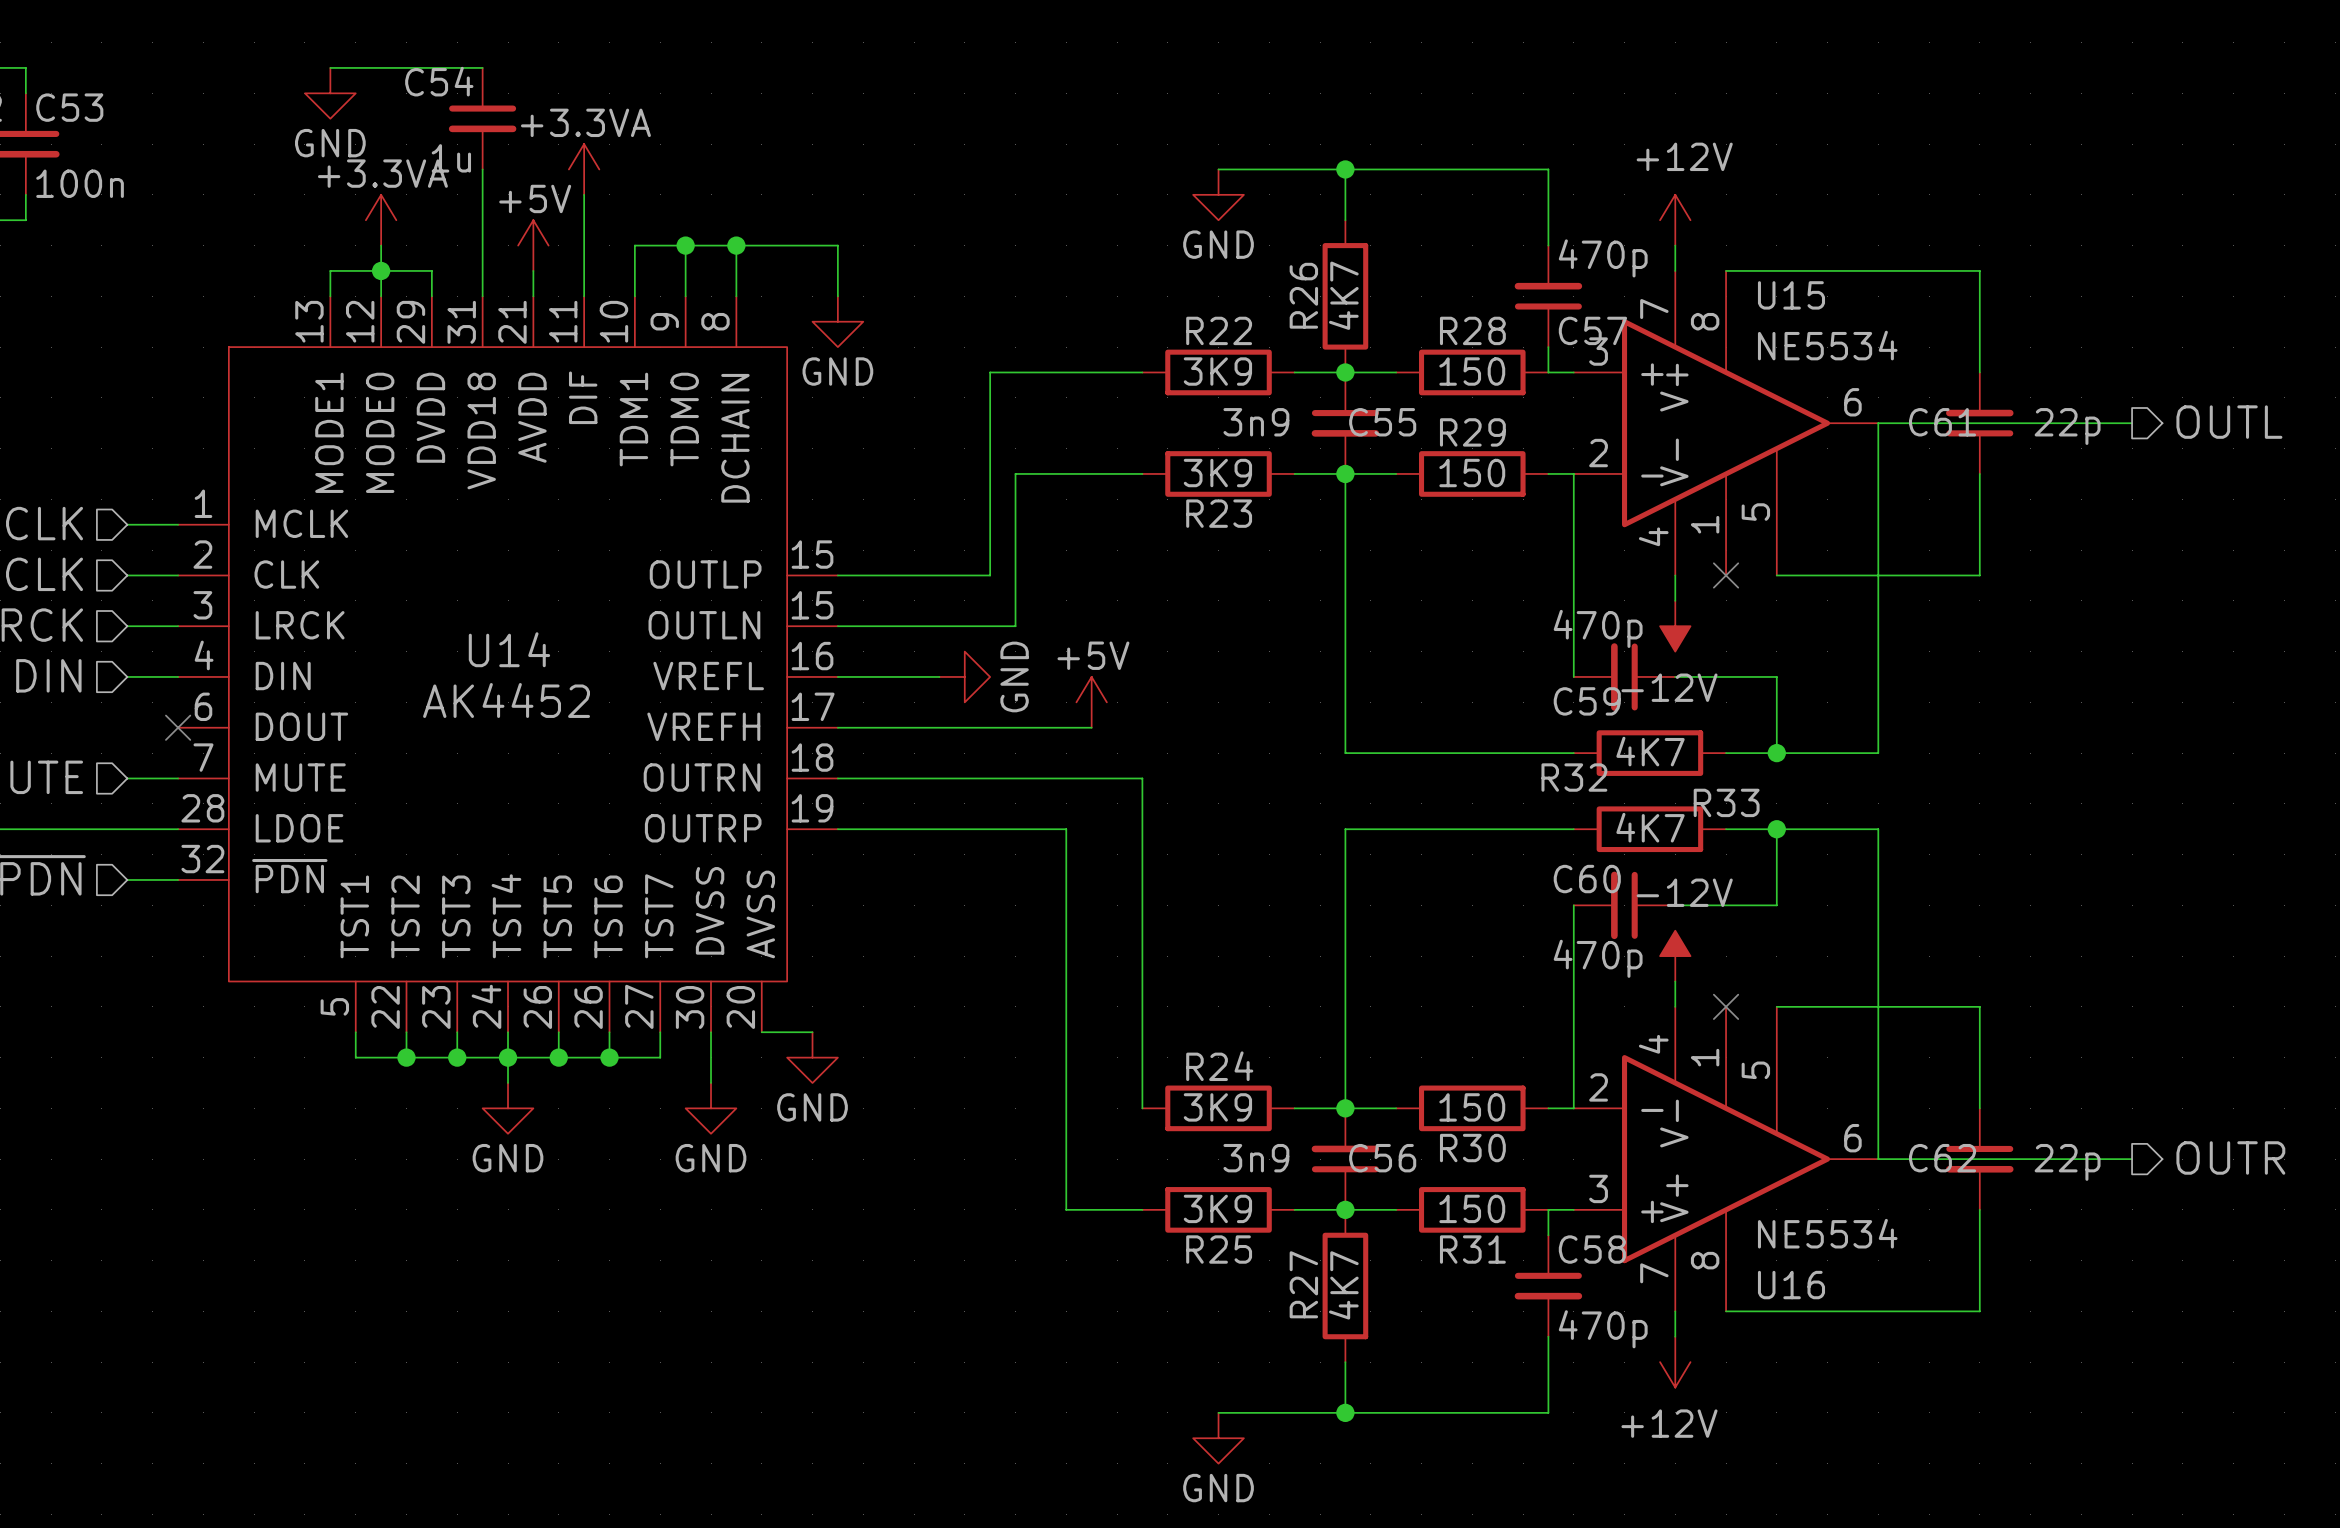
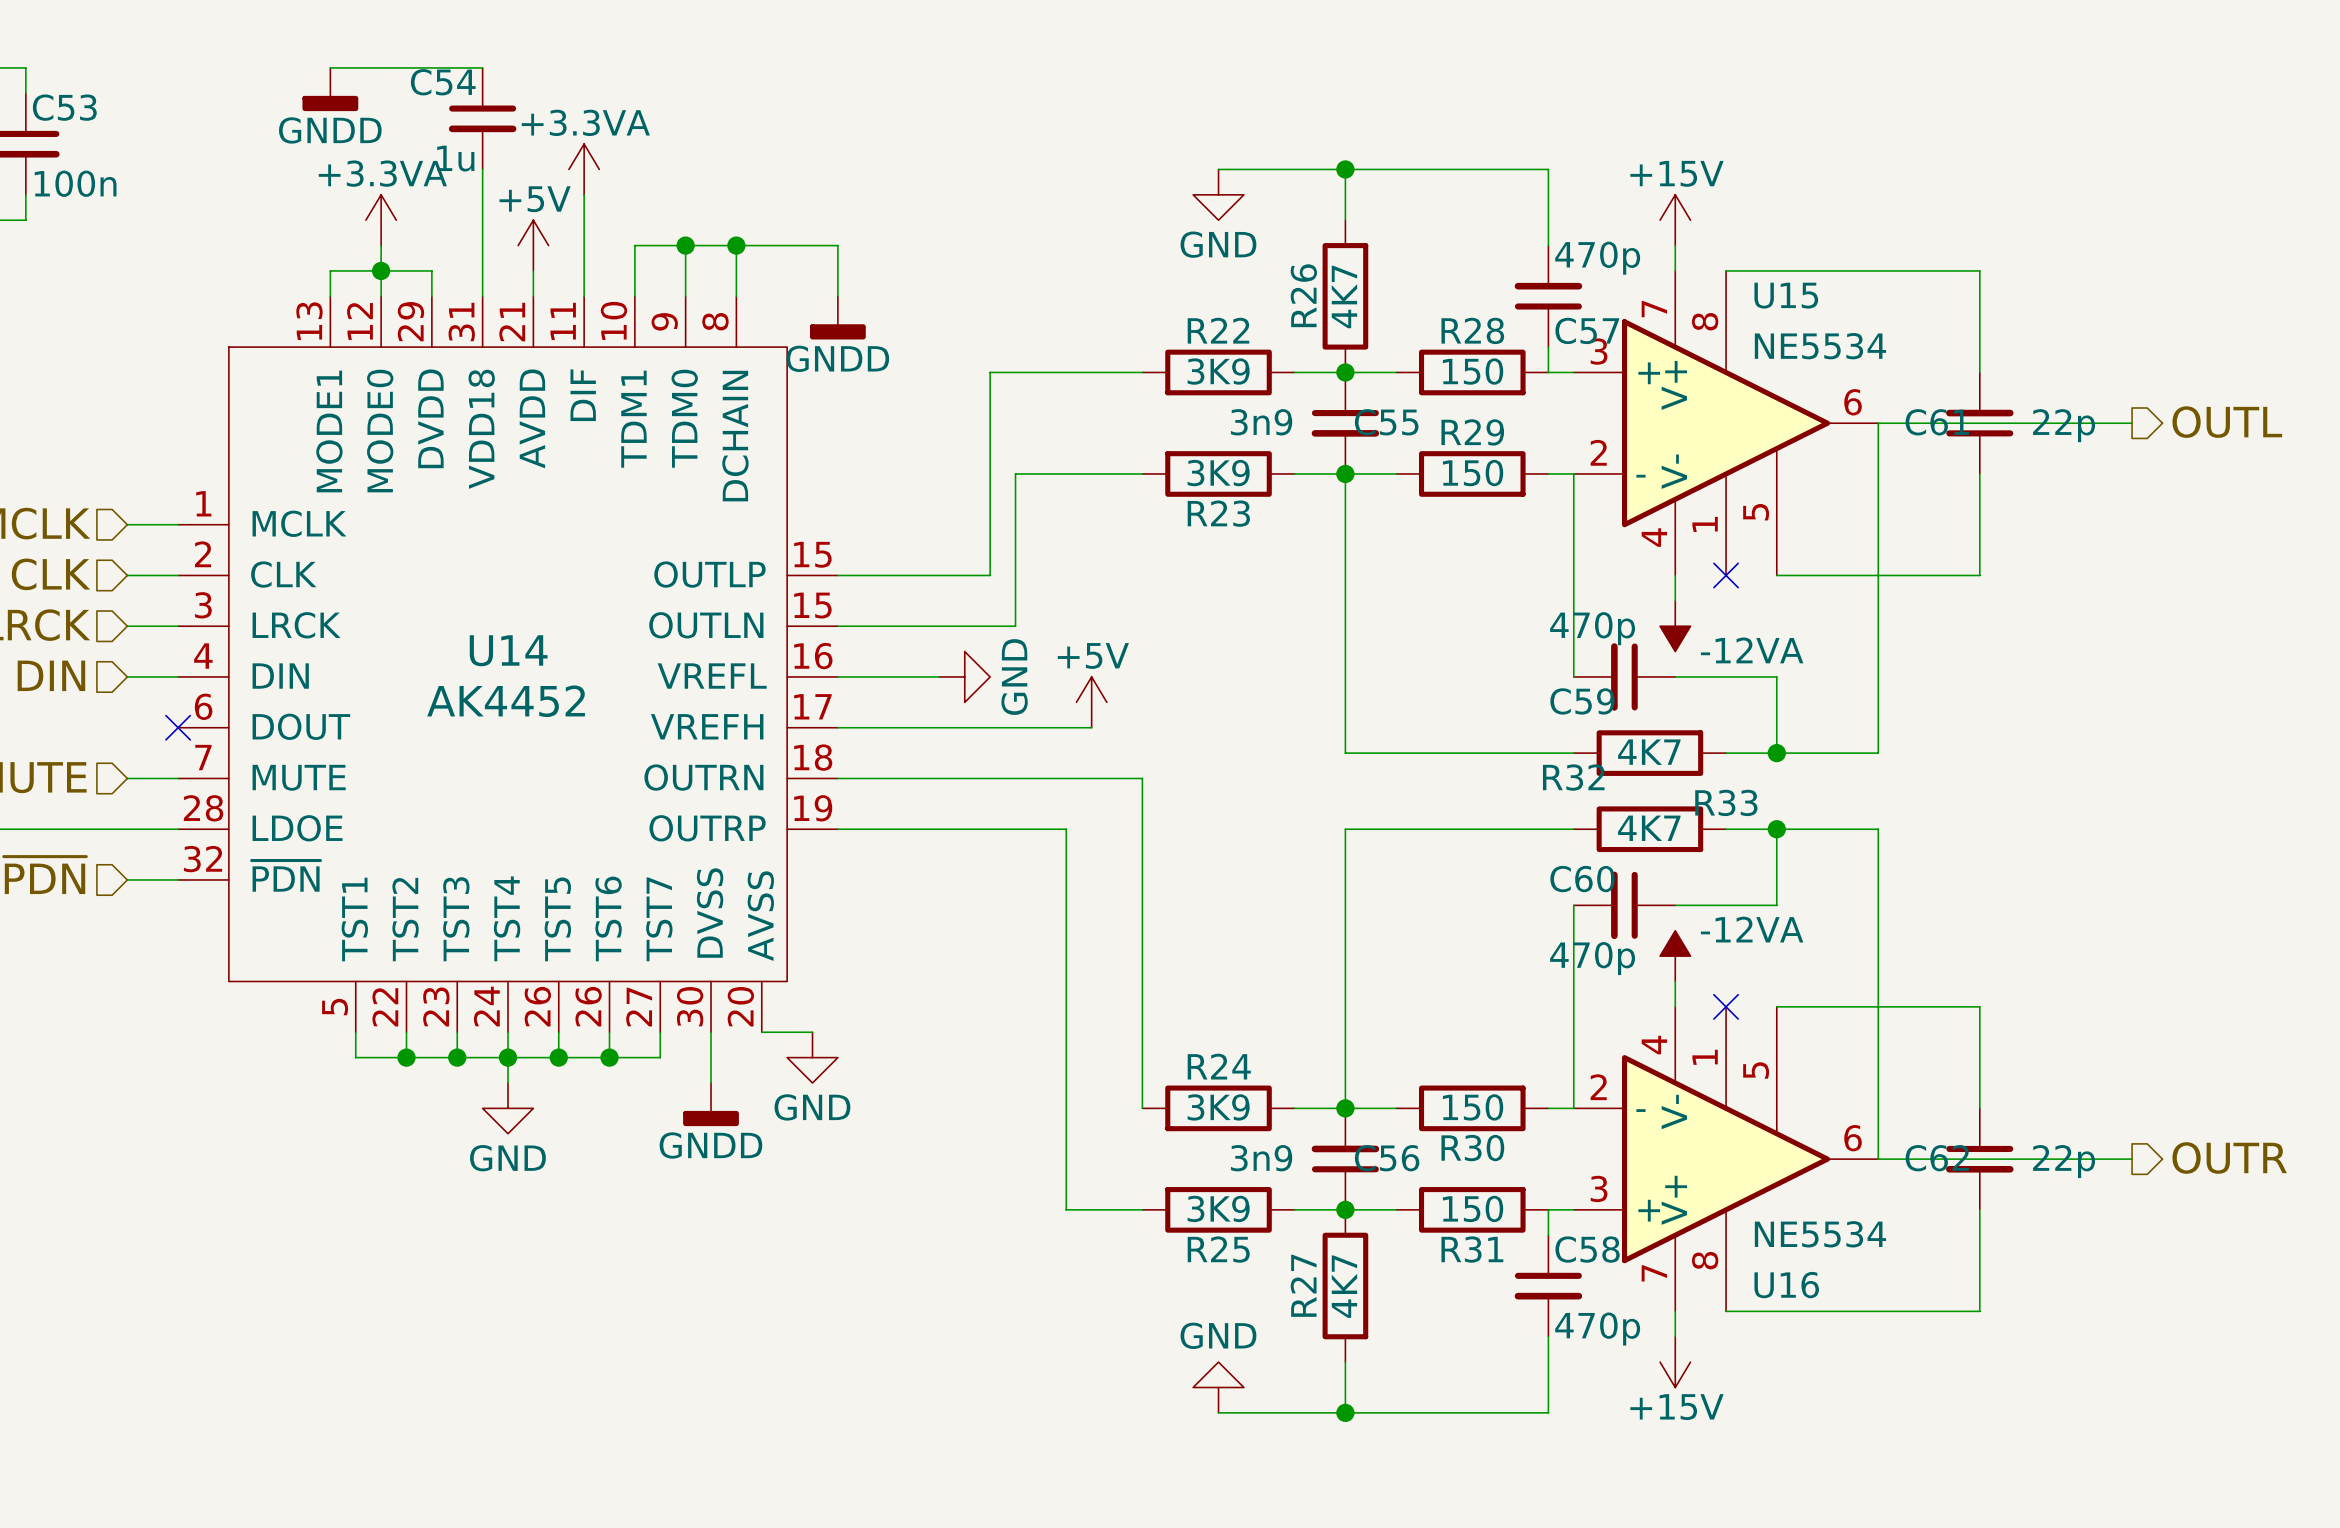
power symbol: GND (330, 93) -> GNDD (330, 89)
power symbol: +12V (1675, 220) -> +15V (1675, 220)
power symbol: GND (837, 321) -> GNDD (837, 317)
power symbol: -12V (1675, 626) -> -12VA (1675, 626)
power symbol: -12V (1675, 956) -> -12VA (1675, 956)
power symbol: GND (711, 1108) -> GNDD (711, 1104)
power symbol: +12V (1675, 1362) -> +15V (1675, 1362)
power symbol rotation: 0° (1218, 1438) -> 180° (1218, 1387)
power symbol position: GND (1218, 1438) -> GND (1218, 1387)

